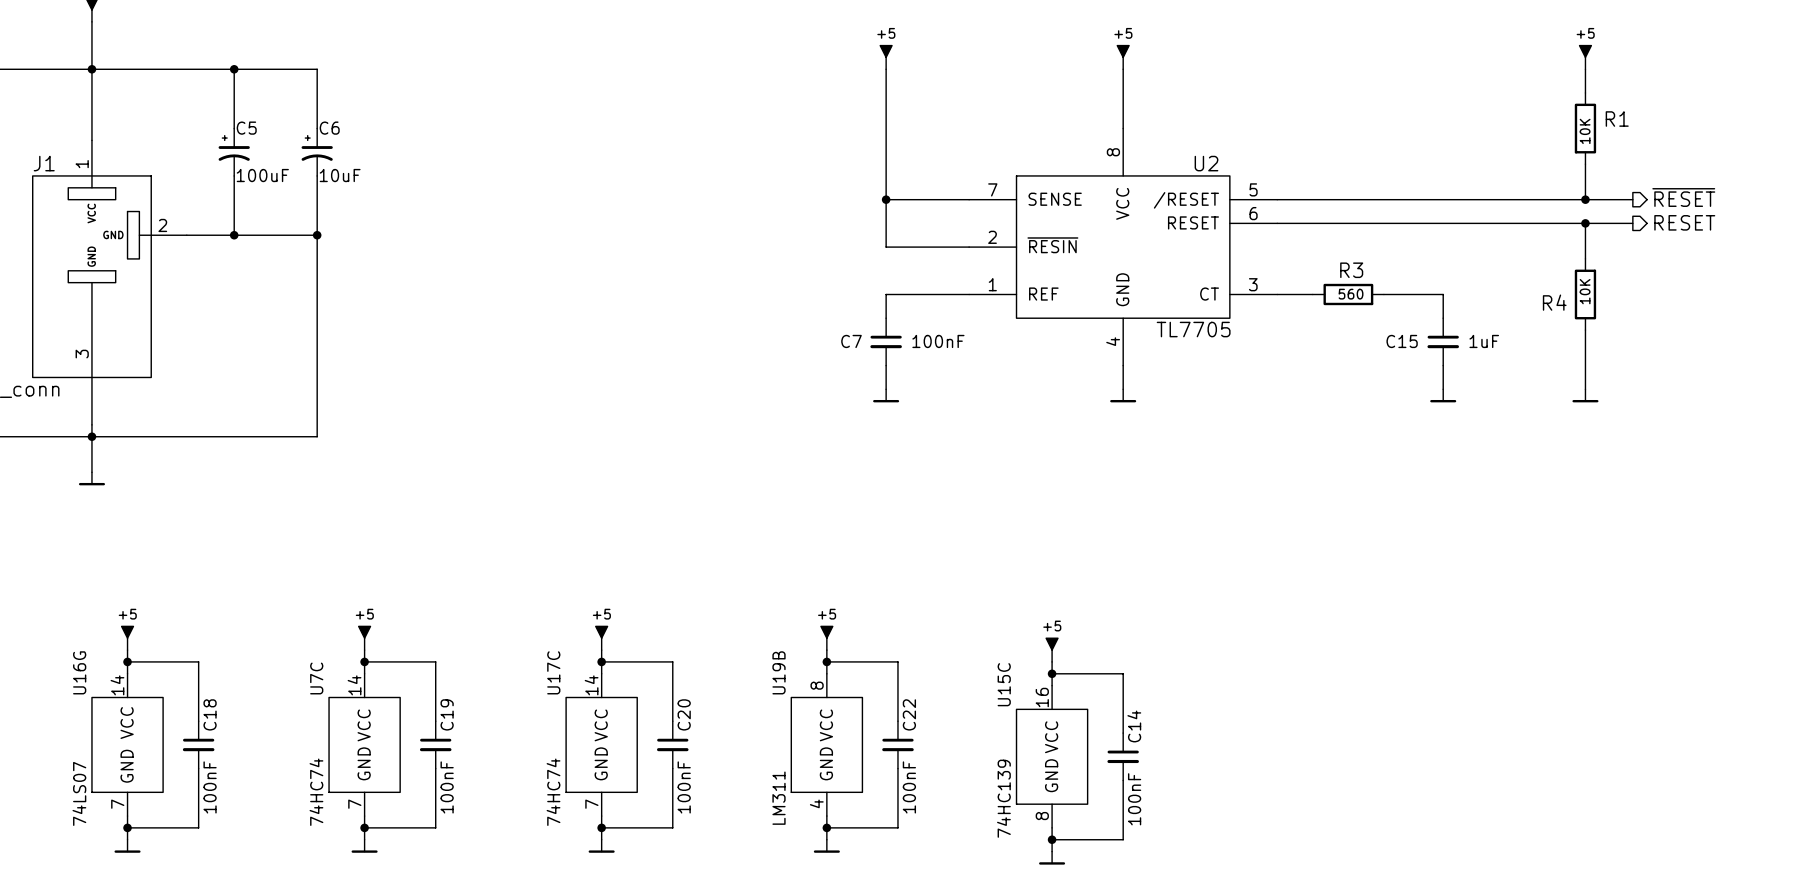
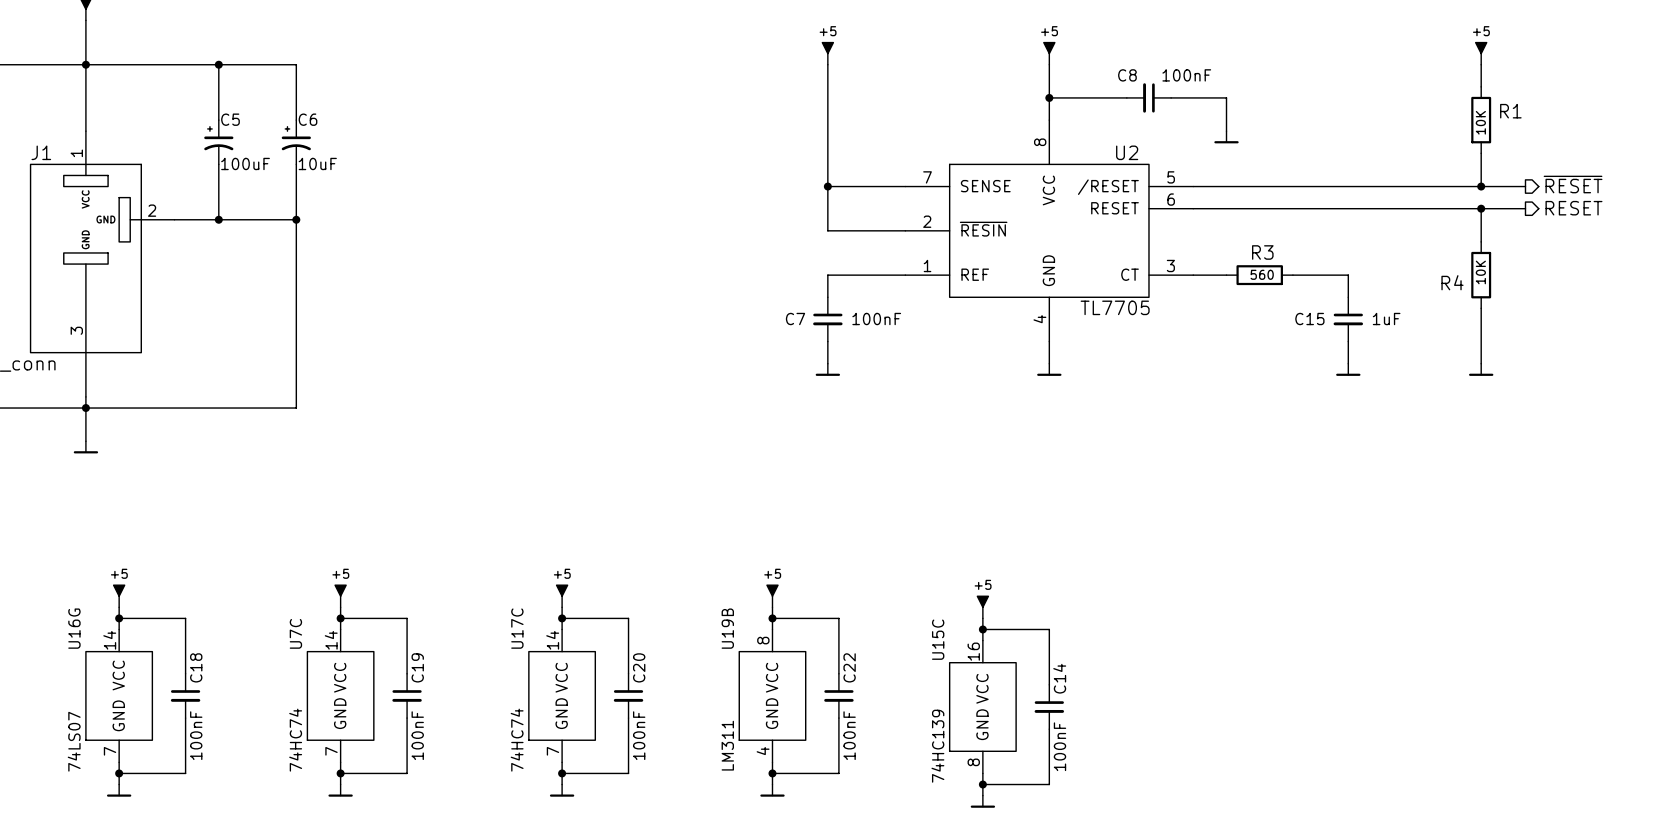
wire: none -> (1049, 97) (1126, 97)
junction: none -> (1049, 97)
C8: none -> 100nF (1148, 97)
wire: none -> (1171, 97) (1226, 97) (1226, 131)
power symbol: none -> (1226, 137)

